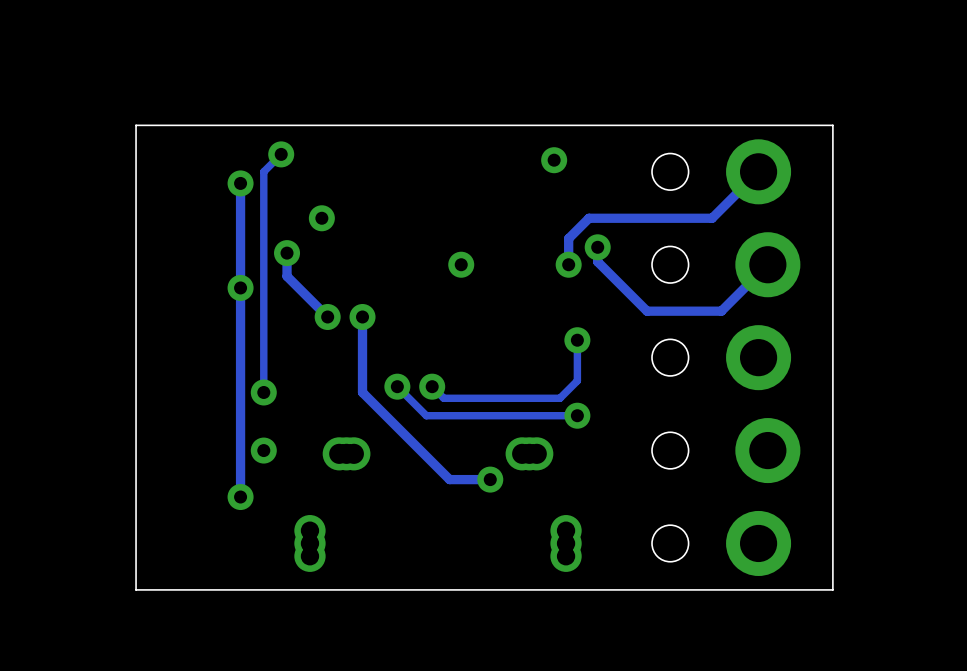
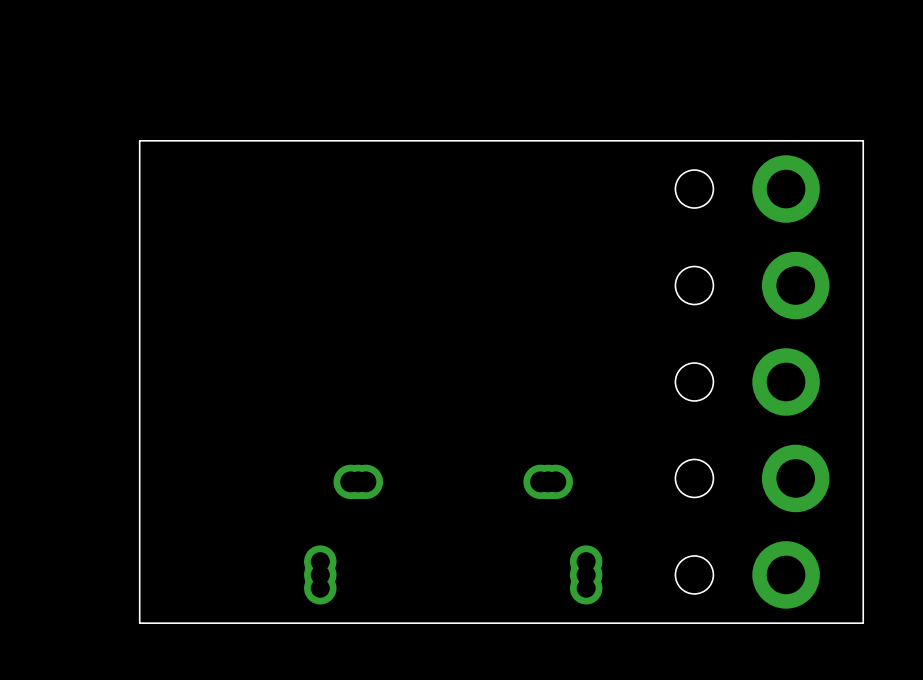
track: (281, 154) (263, 171) (263, 392) -> none
via: (281, 154) -> none
via: (554, 160) -> none
track: (758, 171) (712, 218) (588, 218) (568, 238) (568, 264) -> none
track: (240, 183) (240, 497) -> none
via: (240, 183) -> none
via: (321, 218) -> none
track: (597, 247) (597, 261) (647, 311) (721, 311) (767, 264) -> none
via: (597, 247) -> none
track: (287, 253) (287, 276) (327, 316) -> none
via: (287, 253) -> none
via: (461, 264) -> none
via: (568, 264) -> none
via: (240, 287) -> none
via: (327, 316) -> none
track: (362, 316) (362, 392) (449, 479) (490, 479) -> none
via: (362, 316) -> none
track: (577, 340) (577, 380) (559, 398) (443, 398) (432, 386) -> none
via: (577, 340) -> none
track: (397, 386) (426, 415) (577, 415) -> none
via: (397, 386) -> none
via: (432, 386) -> none
via: (263, 392) -> none
via: (577, 415) -> none
via: (263, 450) -> none
via: (490, 479) -> none
via: (240, 497) -> none

